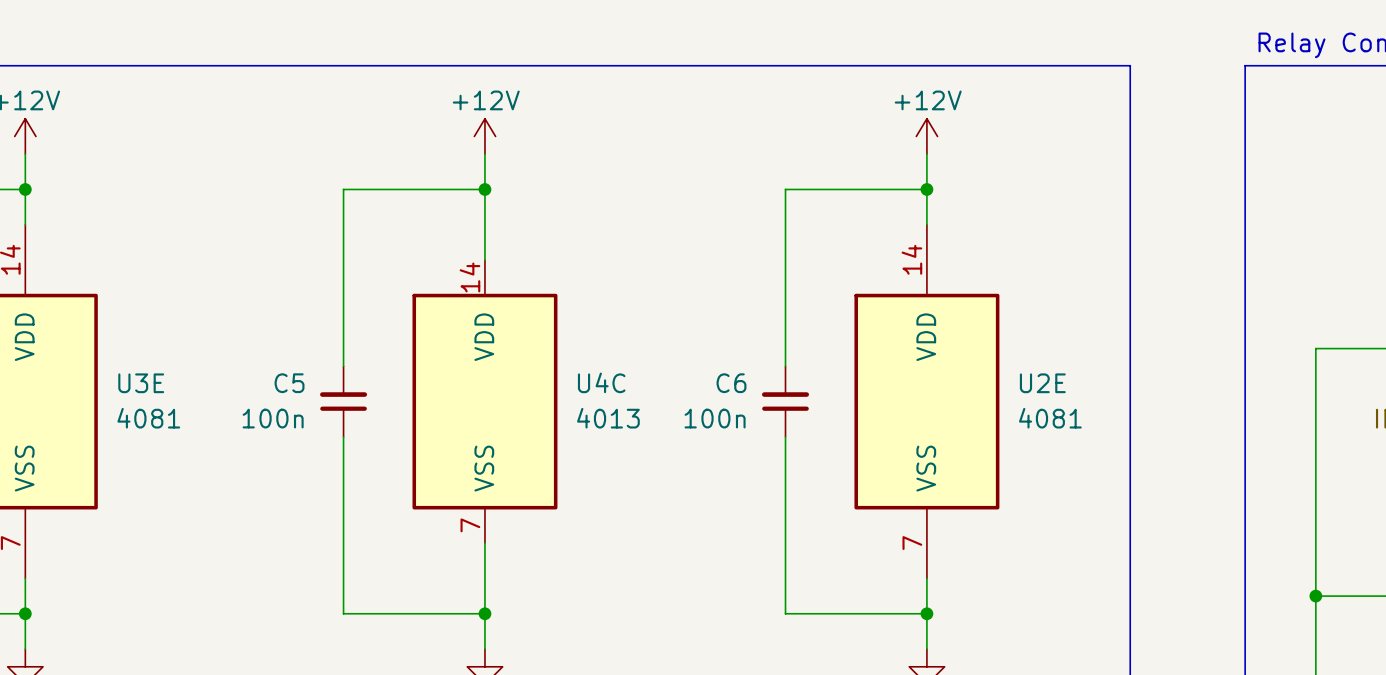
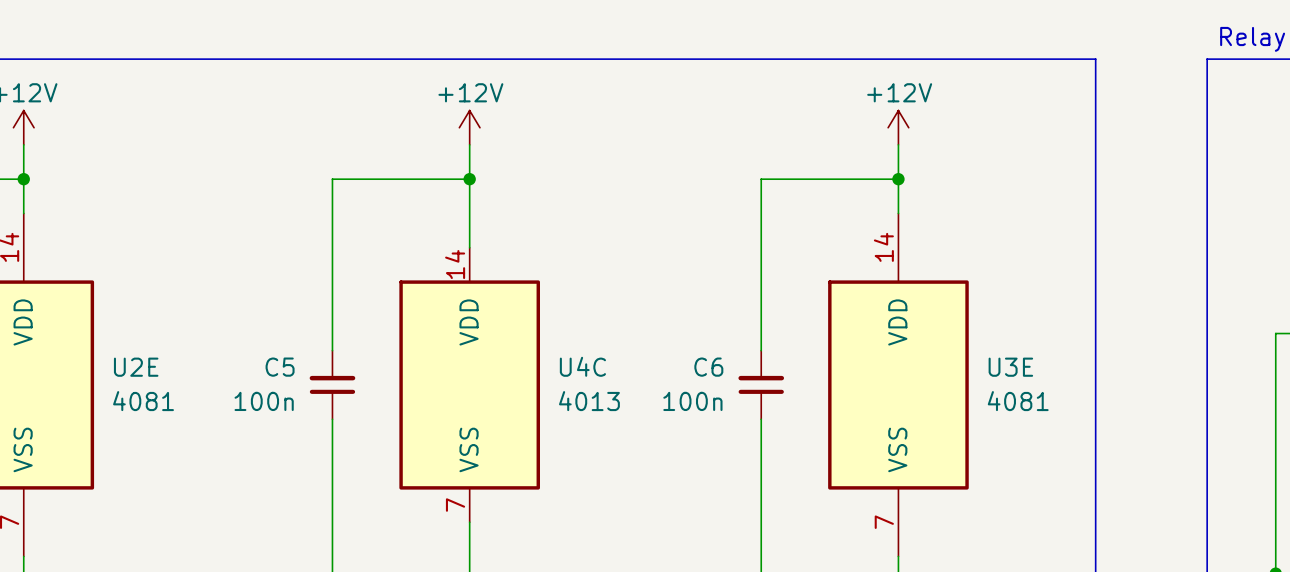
U3E name: U3E (141, 383) -> U2E (136, 367)
U2E name: U2E (1042, 383) -> U3E (1010, 367)

